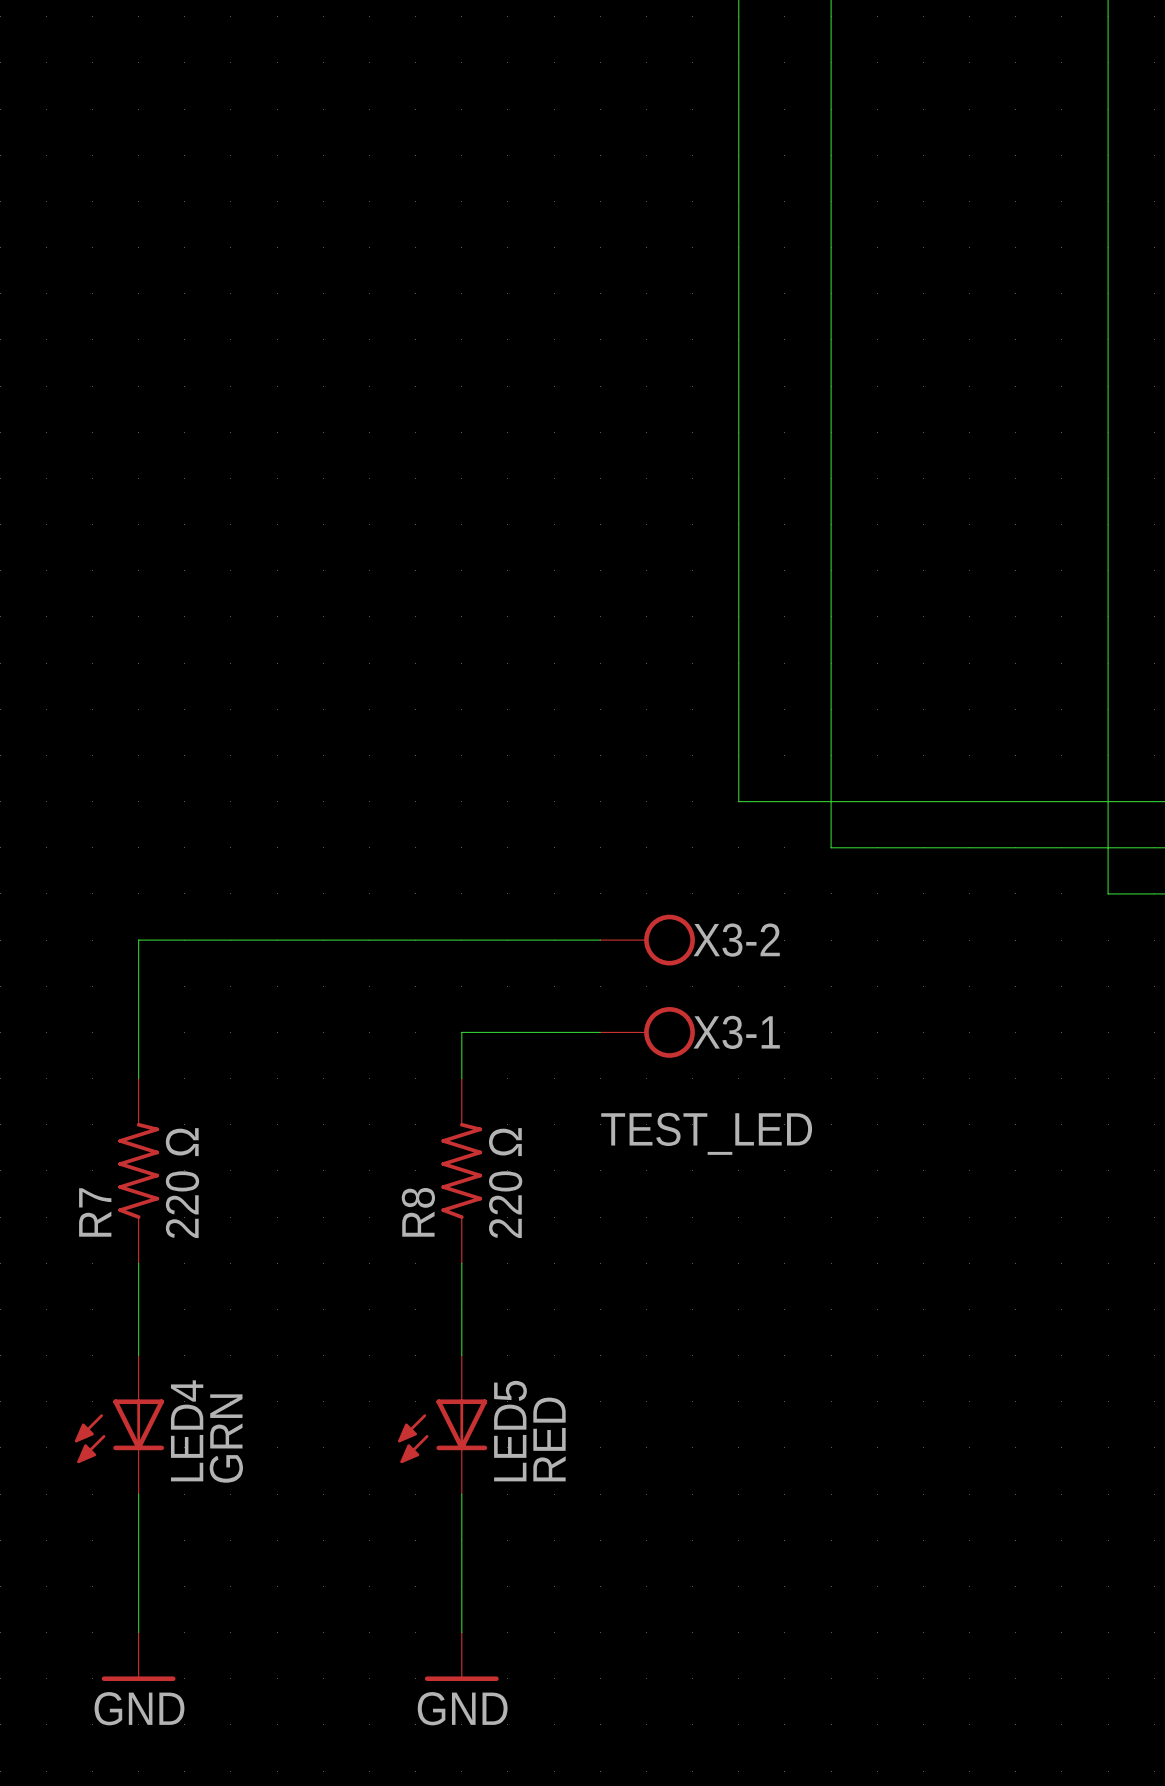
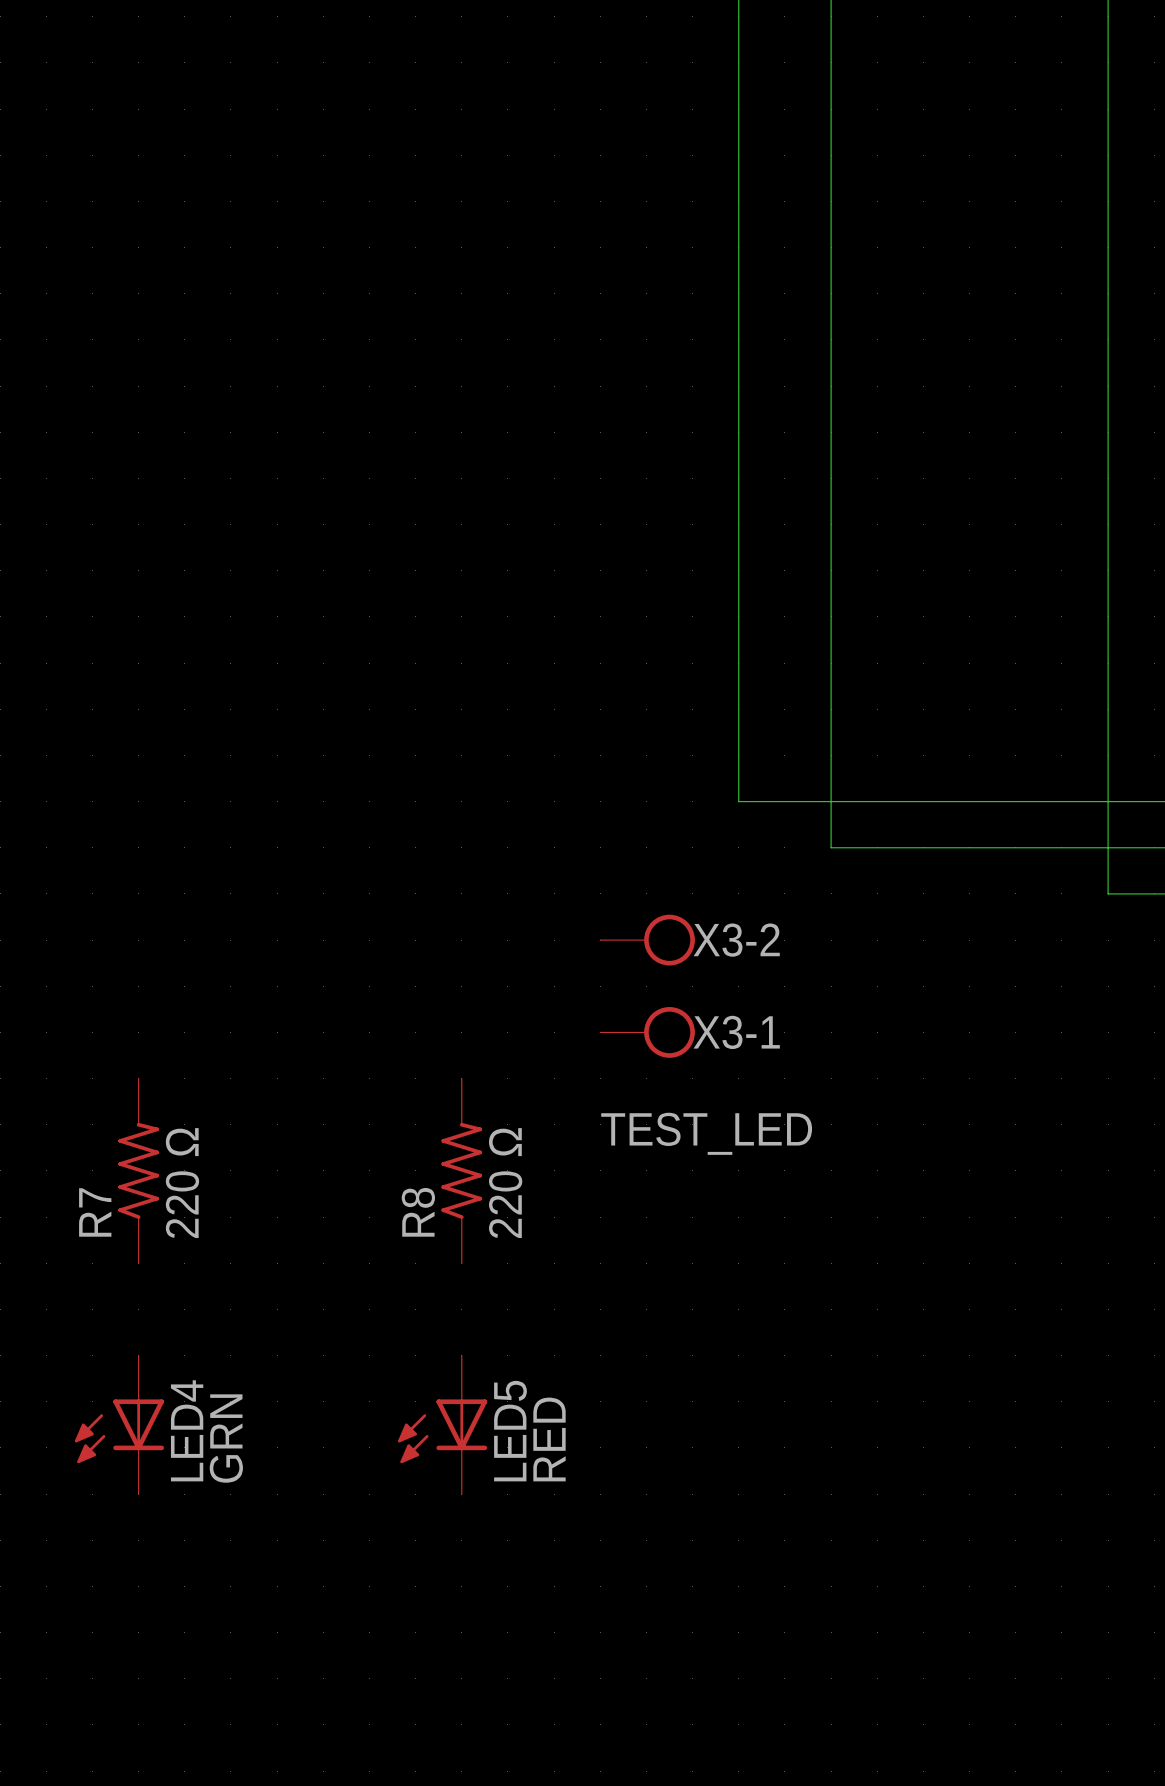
wire: (600, 940) (138, 940) (138, 1078) -> none
wire: (600, 1032) (461, 1032) (461, 1078) -> none
wire: (138, 1263) (138, 1355) -> none
wire: (461, 1263) (461, 1355) -> none
wire: (138, 1494) (138, 1632) -> none
wire: (461, 1494) (461, 1632) -> none
power symbol: GND (138, 1656) -> none
power symbol: GND (461, 1656) -> none

